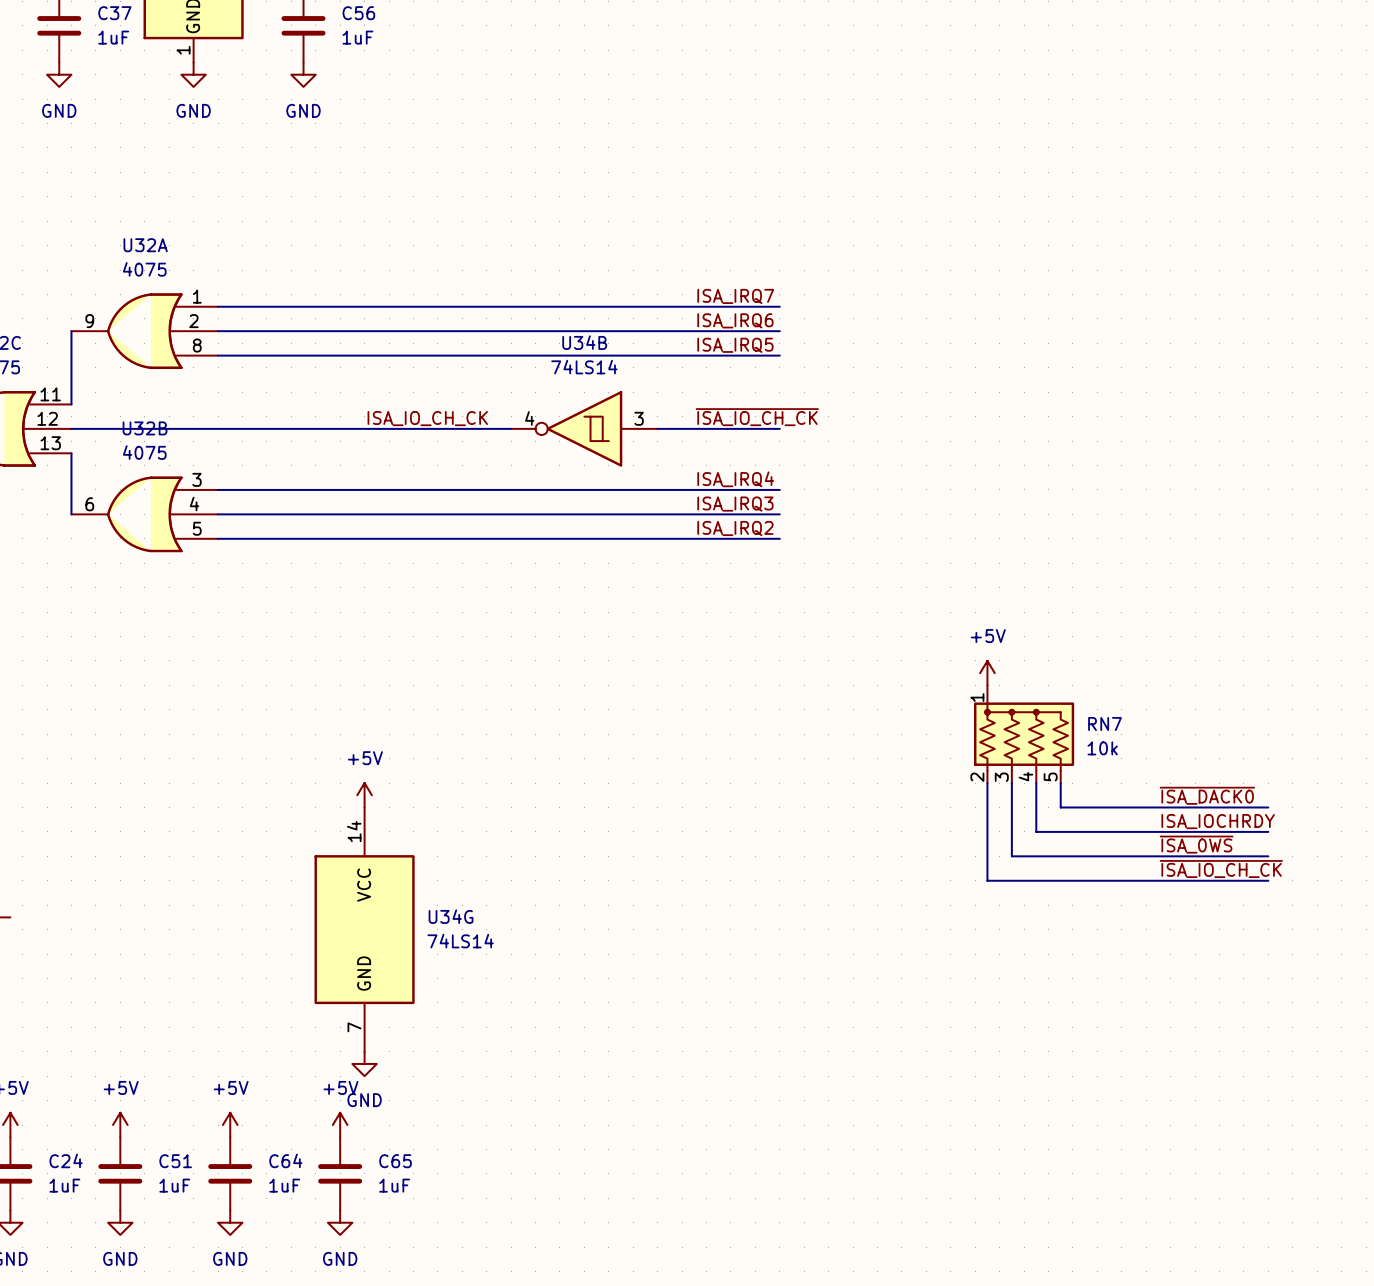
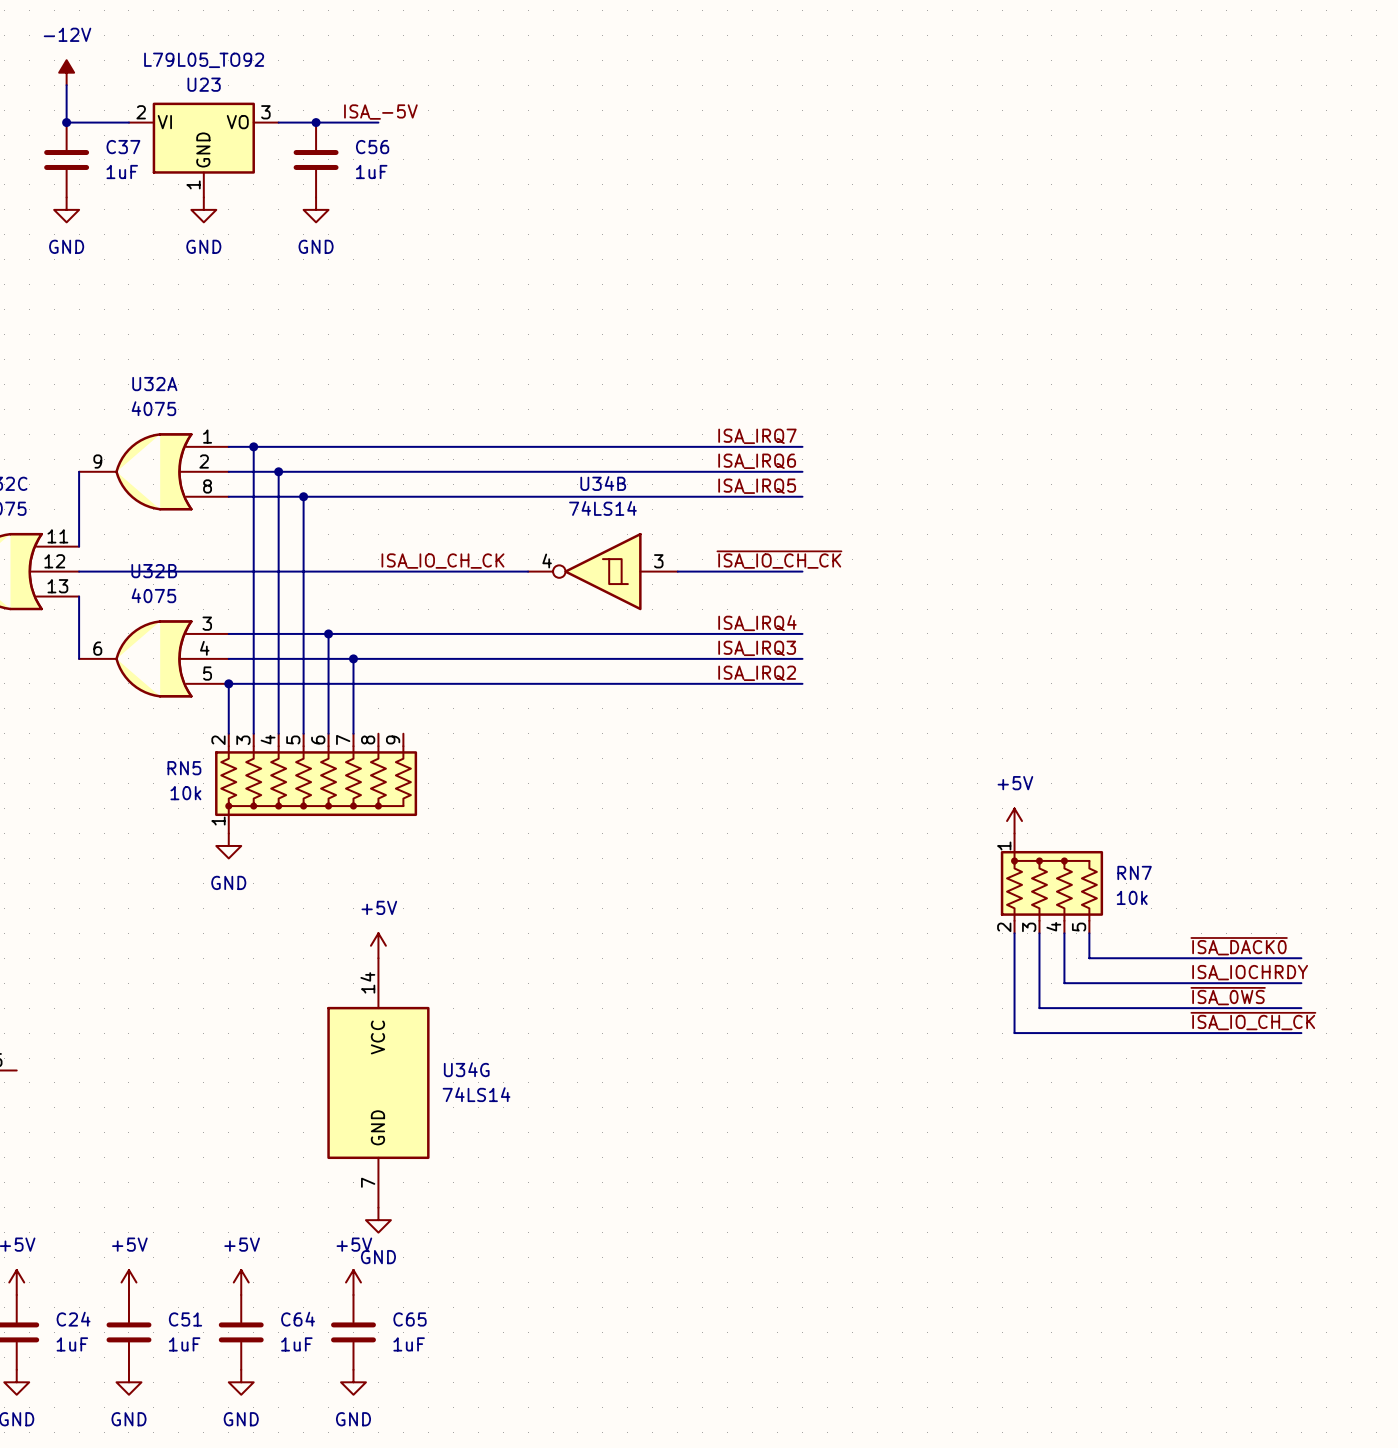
wire: none -> (253, 446) (253, 733)
junction: none -> (253, 446)
wire: none -> (278, 471) (278, 733)
junction: none -> (278, 471)
wire: none -> (303, 496) (303, 733)
junction: none -> (303, 496)
wire: none -> (328, 633) (328, 733)
junction: none -> (328, 633)
wire: none -> (353, 658) (353, 733)
junction: none -> (353, 658)
wire: none -> (228, 683) (228, 733)
junction: none -> (228, 683)
RN5: none -> 10k (316, 783)
power symbol: none -> GND (228, 845)

